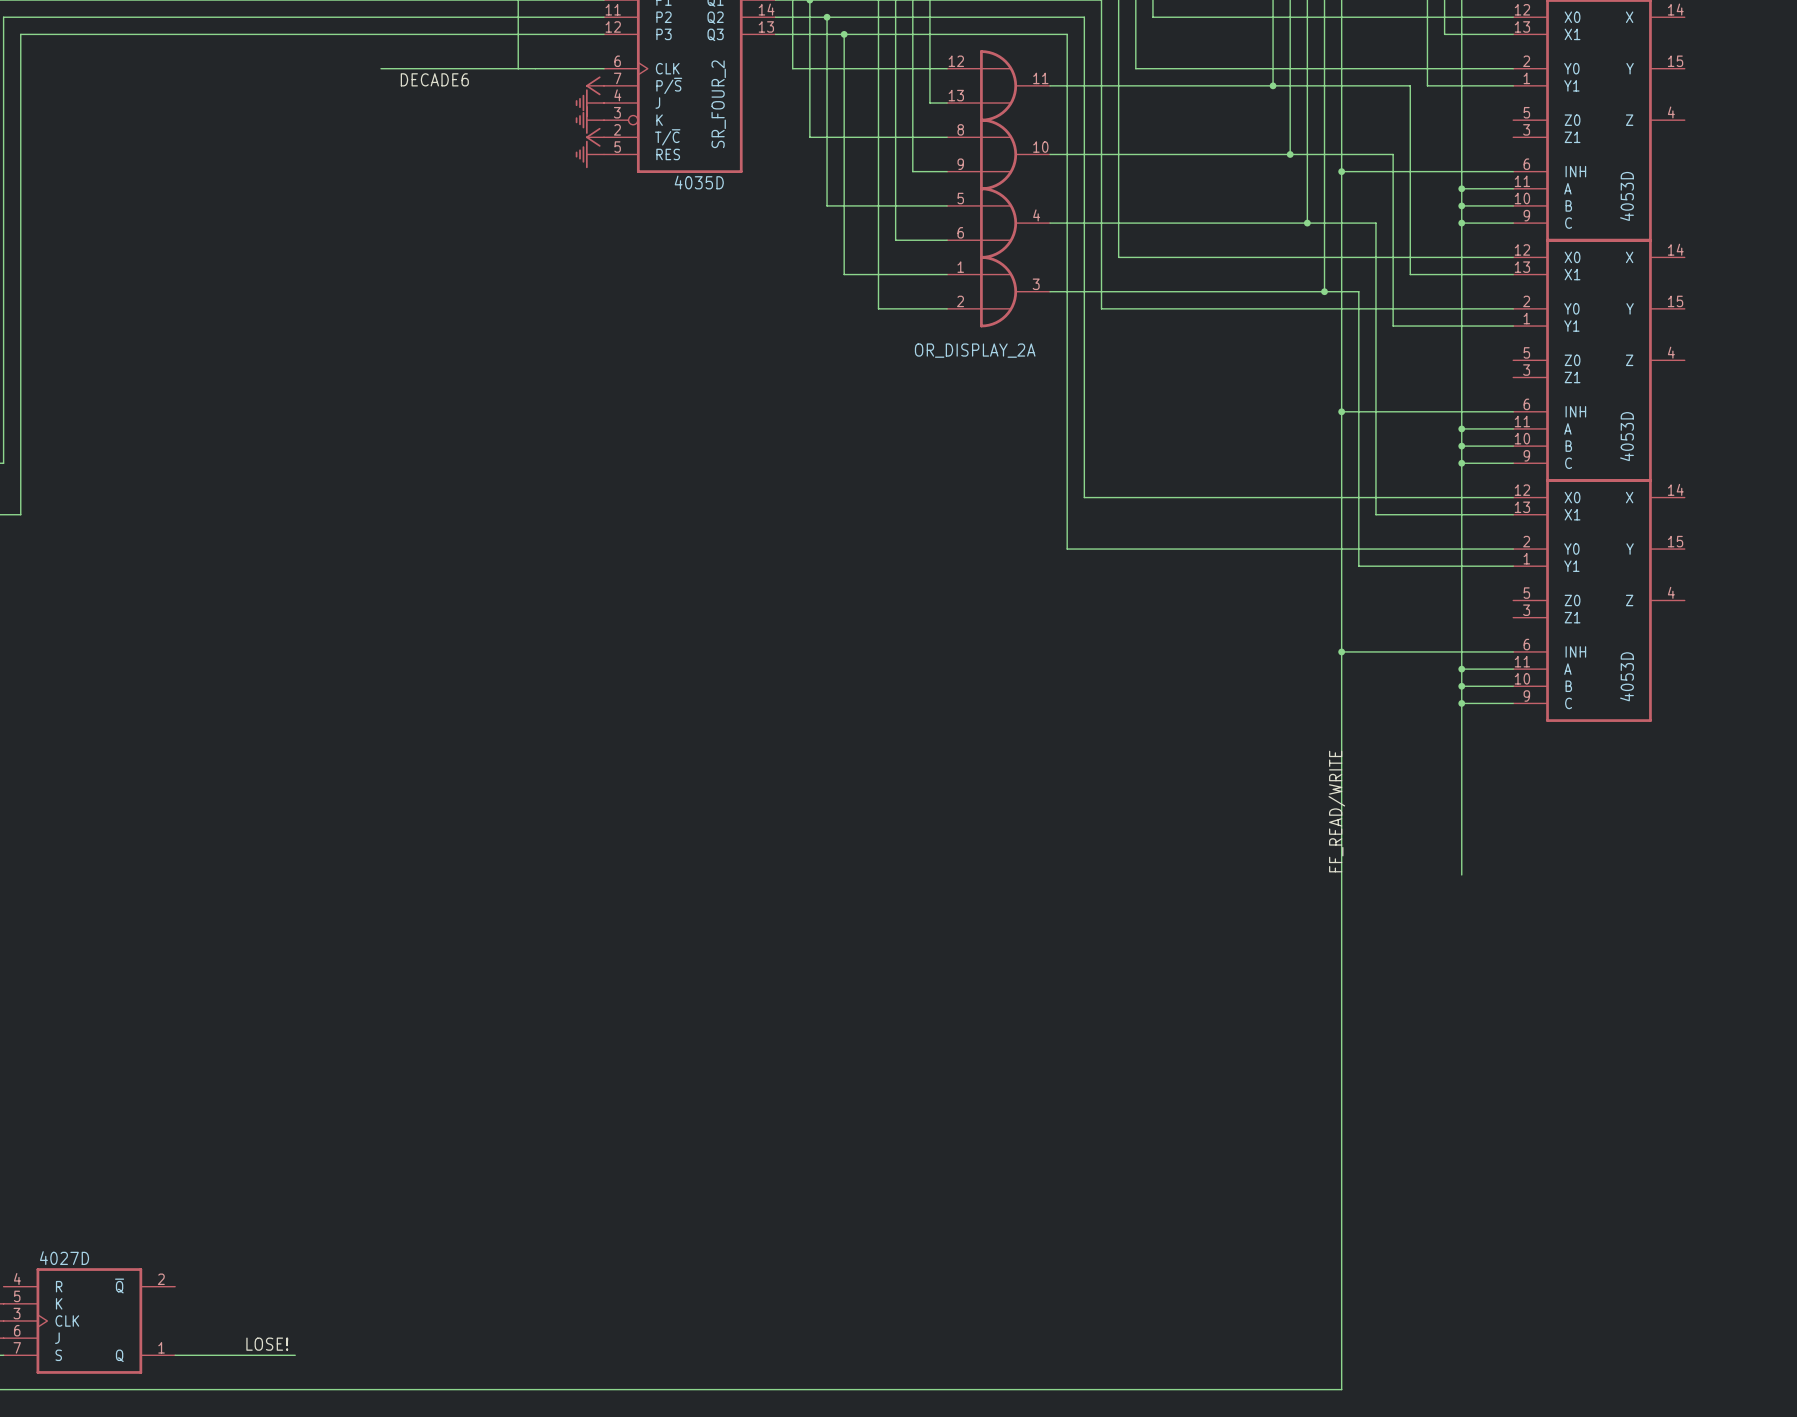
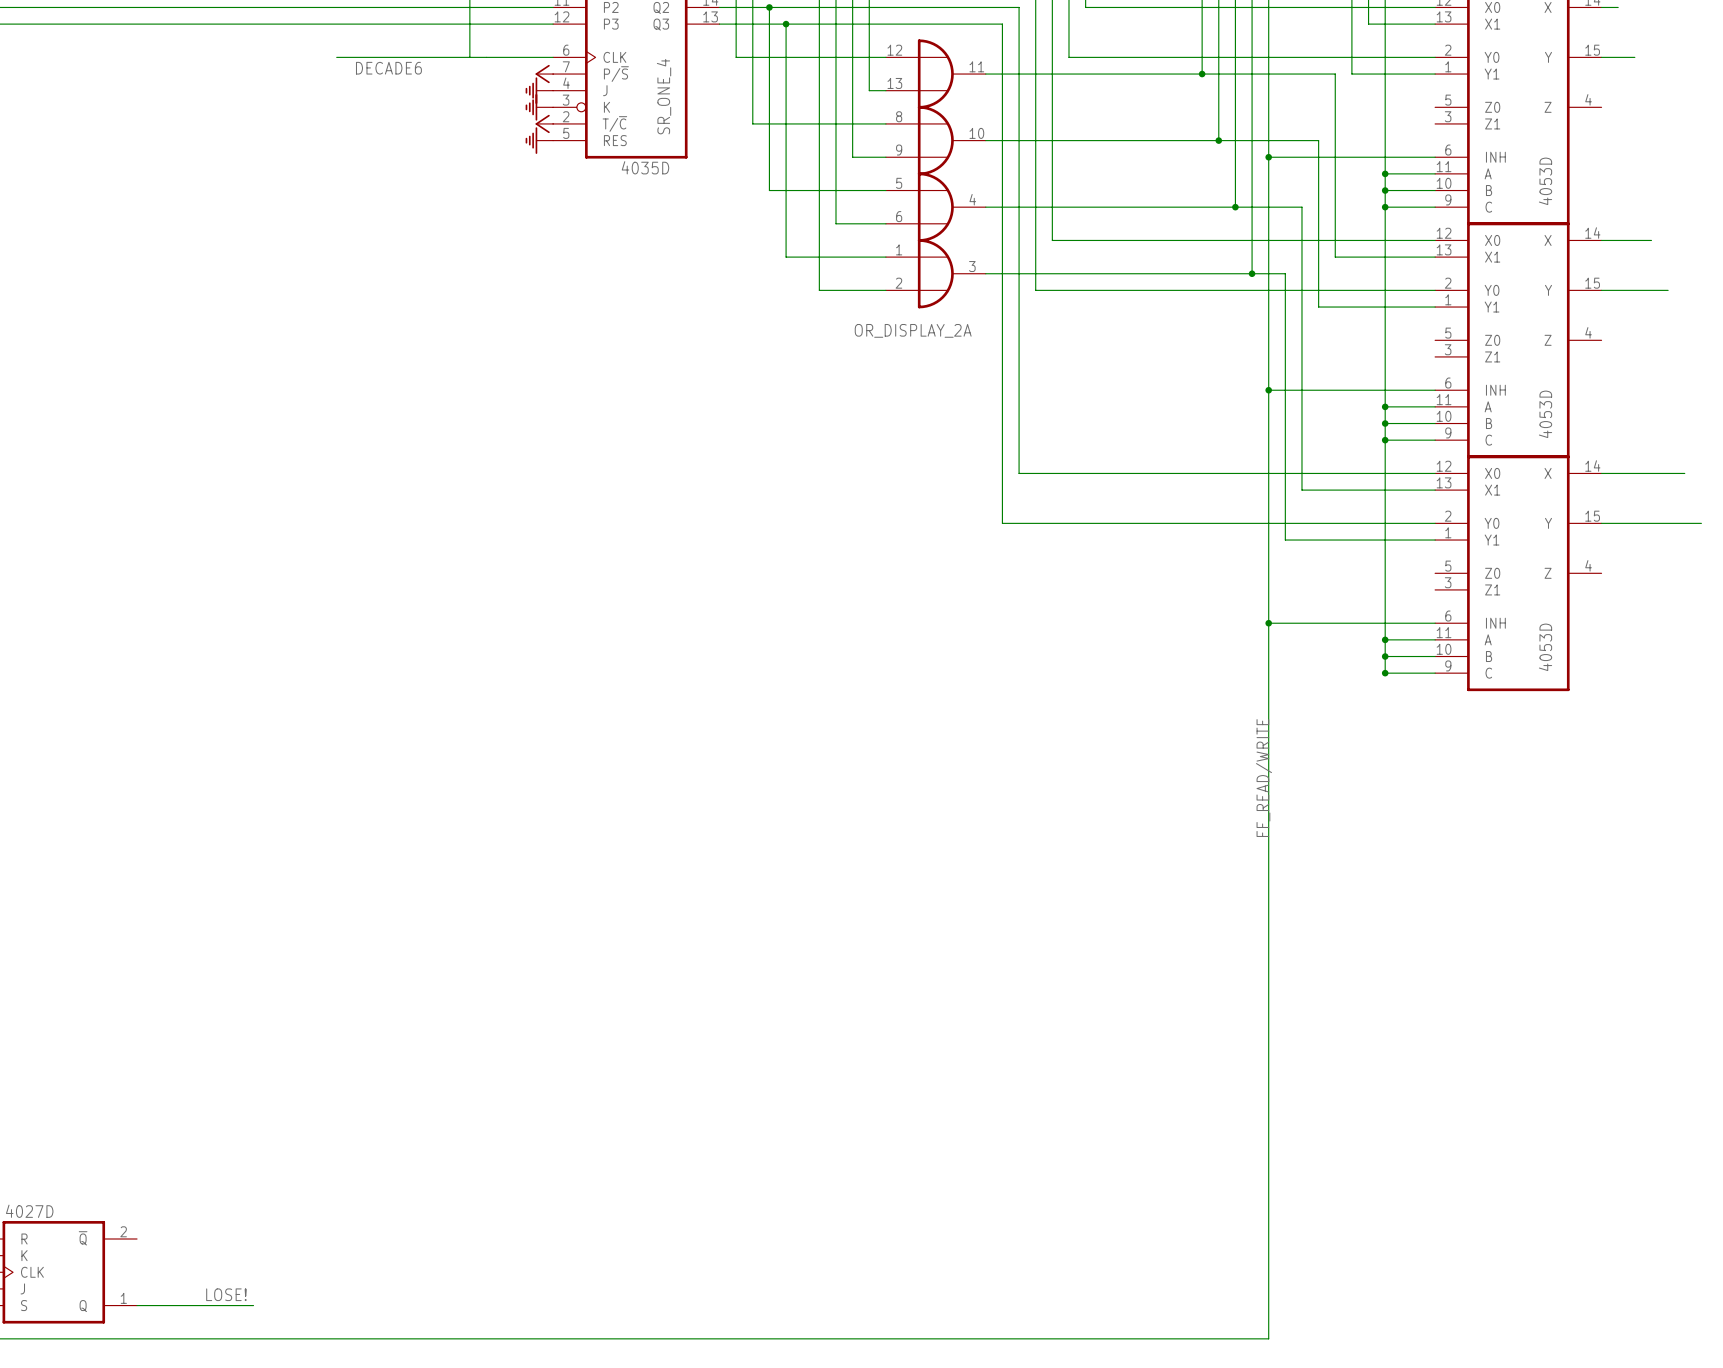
wire: none -> (1601, 7) (1618, 7)
wire: none -> (1601, 57) (1634, 57)
SR_FOUR_2 name: SR_FOUR_2 (718, 104) -> SR_ONE_4 (664, 96)
wire: none -> (1601, 240) (1651, 240)
wire: none -> (1601, 290) (1668, 290)
wire: none -> (1601, 473) (1684, 473)
wire: none -> (1601, 523) (1701, 523)
wire: (1461, 703) (1461, 874) -> none

